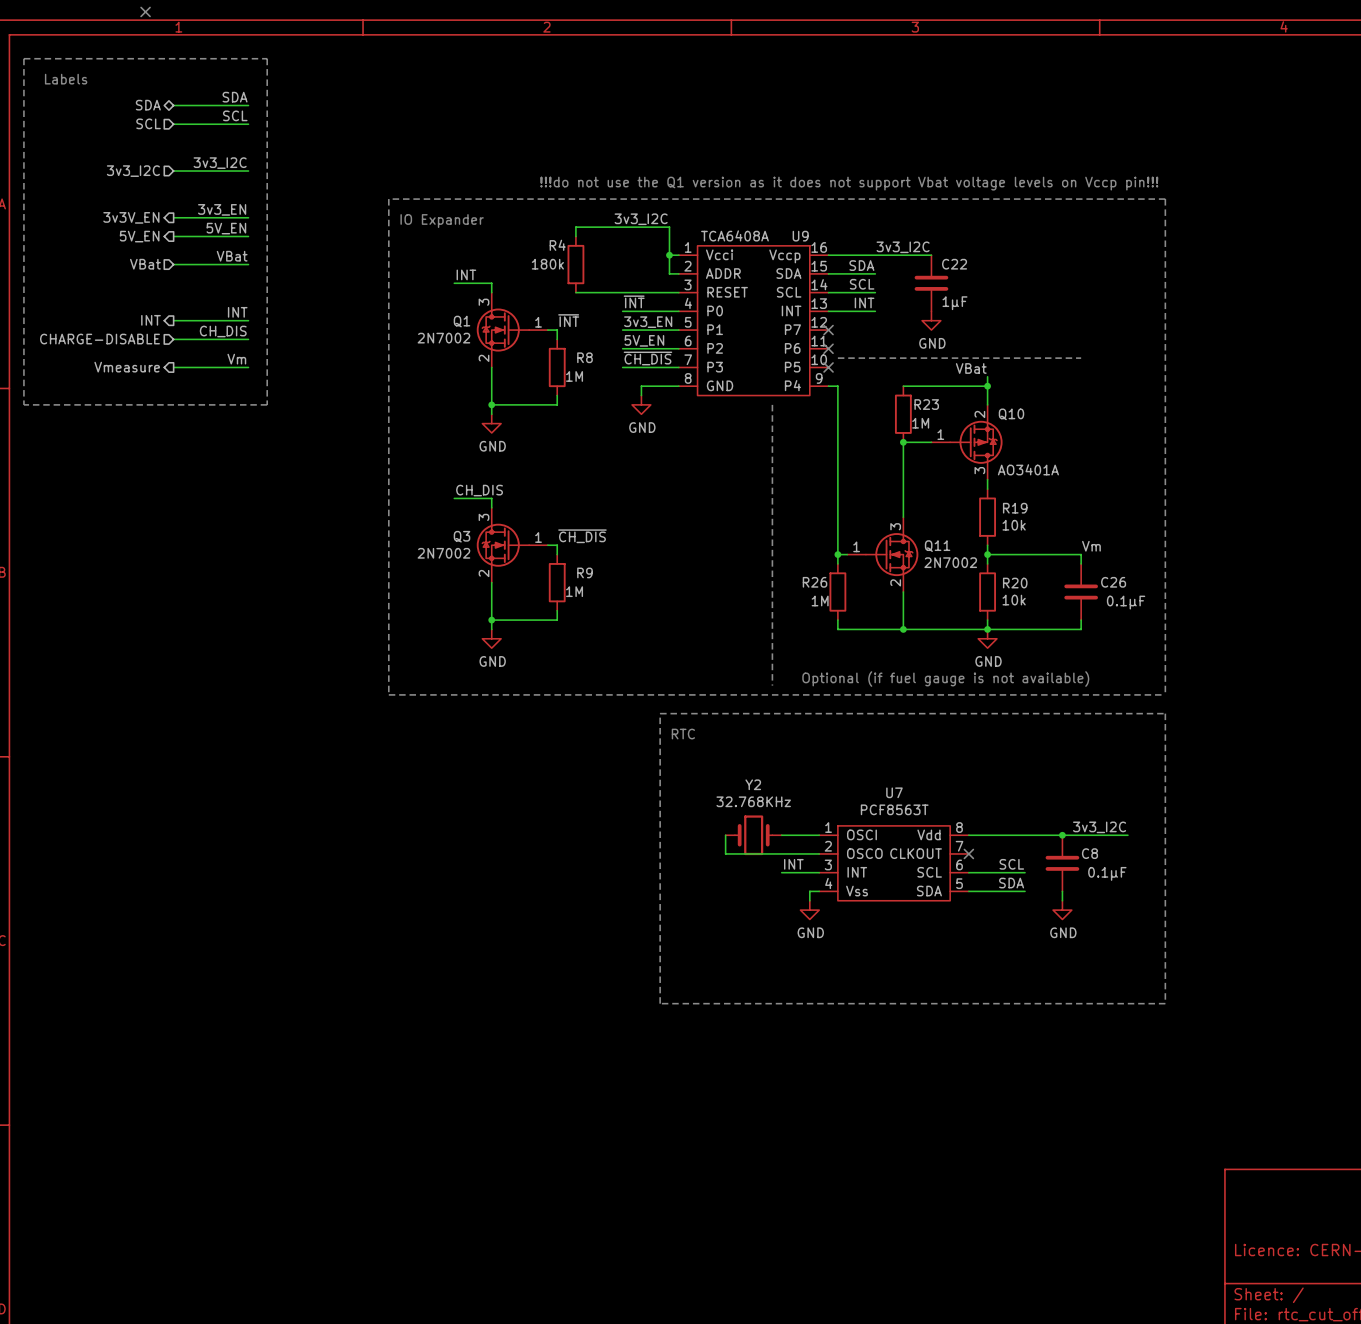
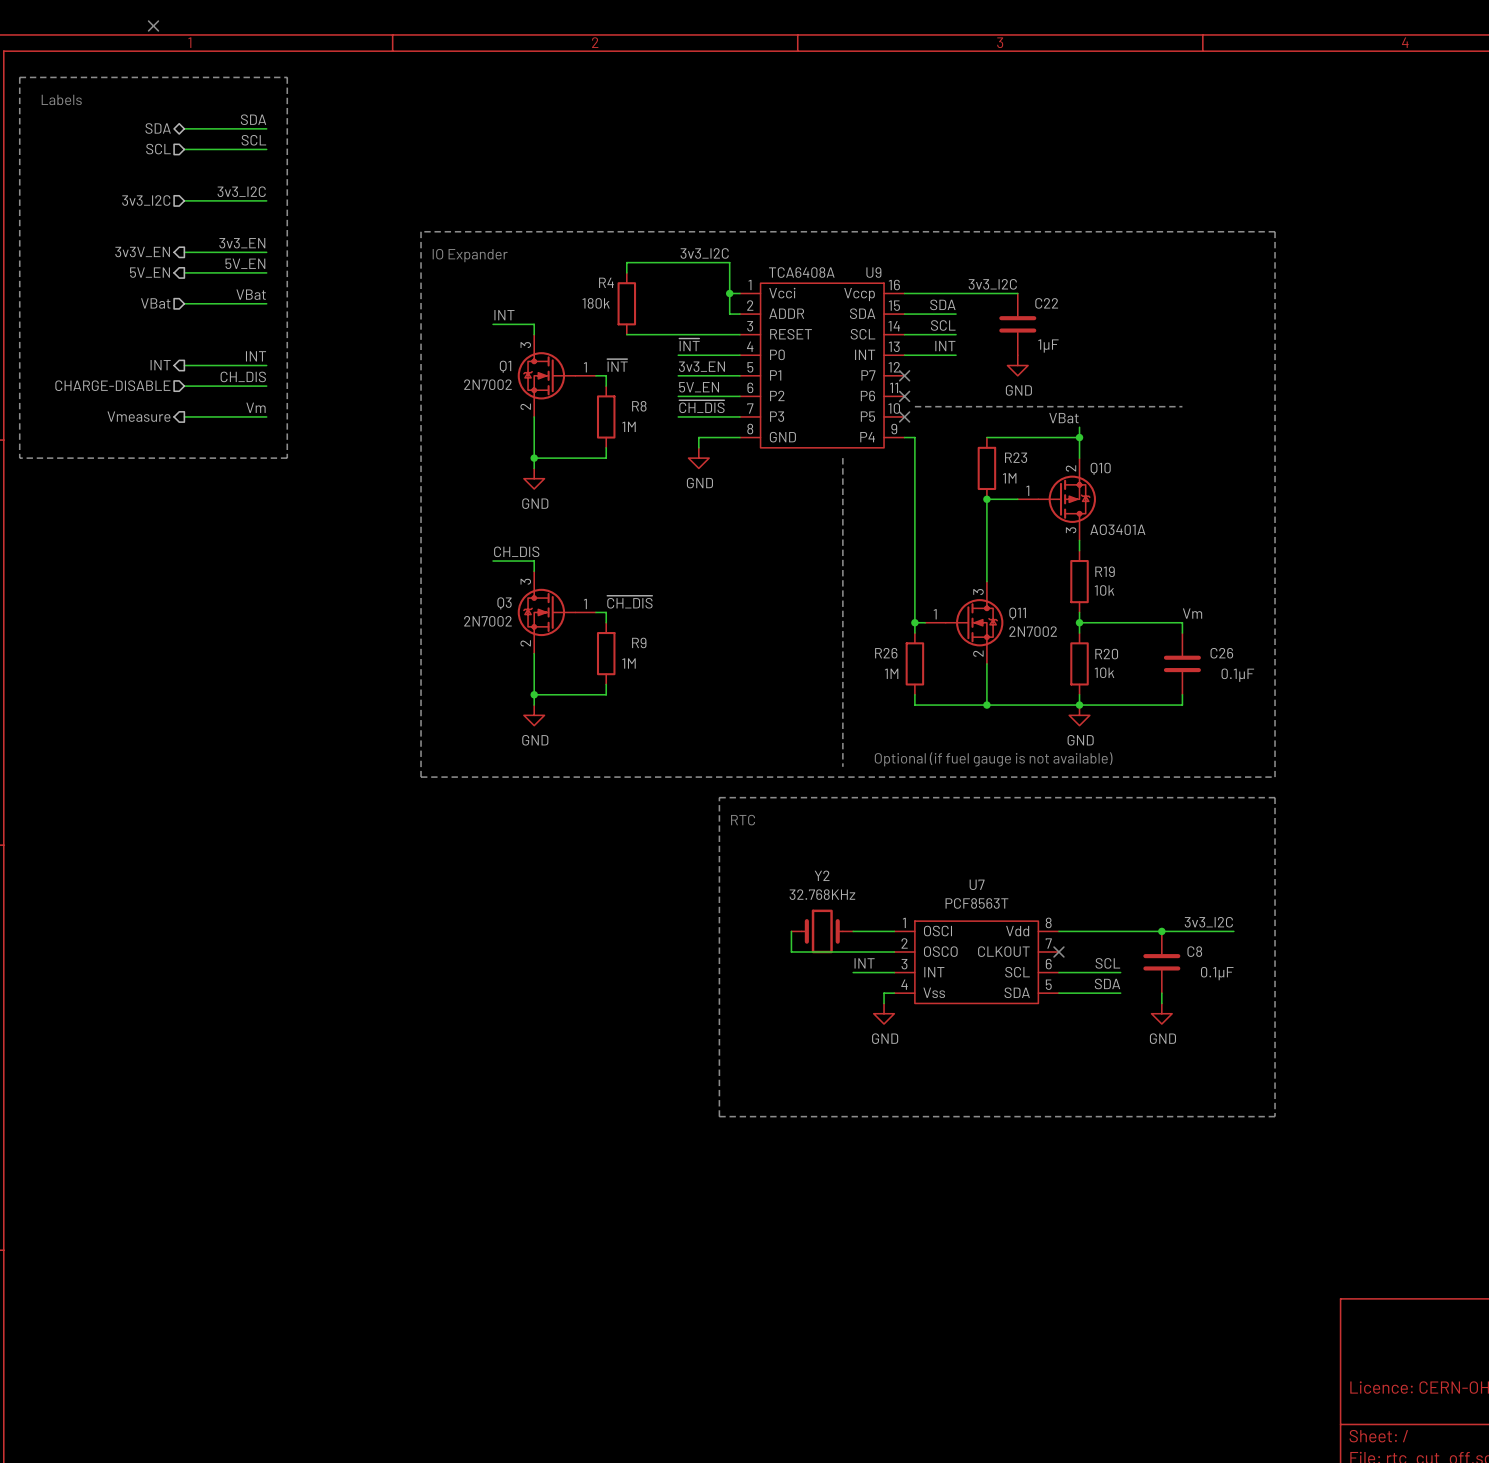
text: !!!do not use the Q1 version as it does not support Vbat voltage levels on Vccp pin!!! (849, 183) -> none

